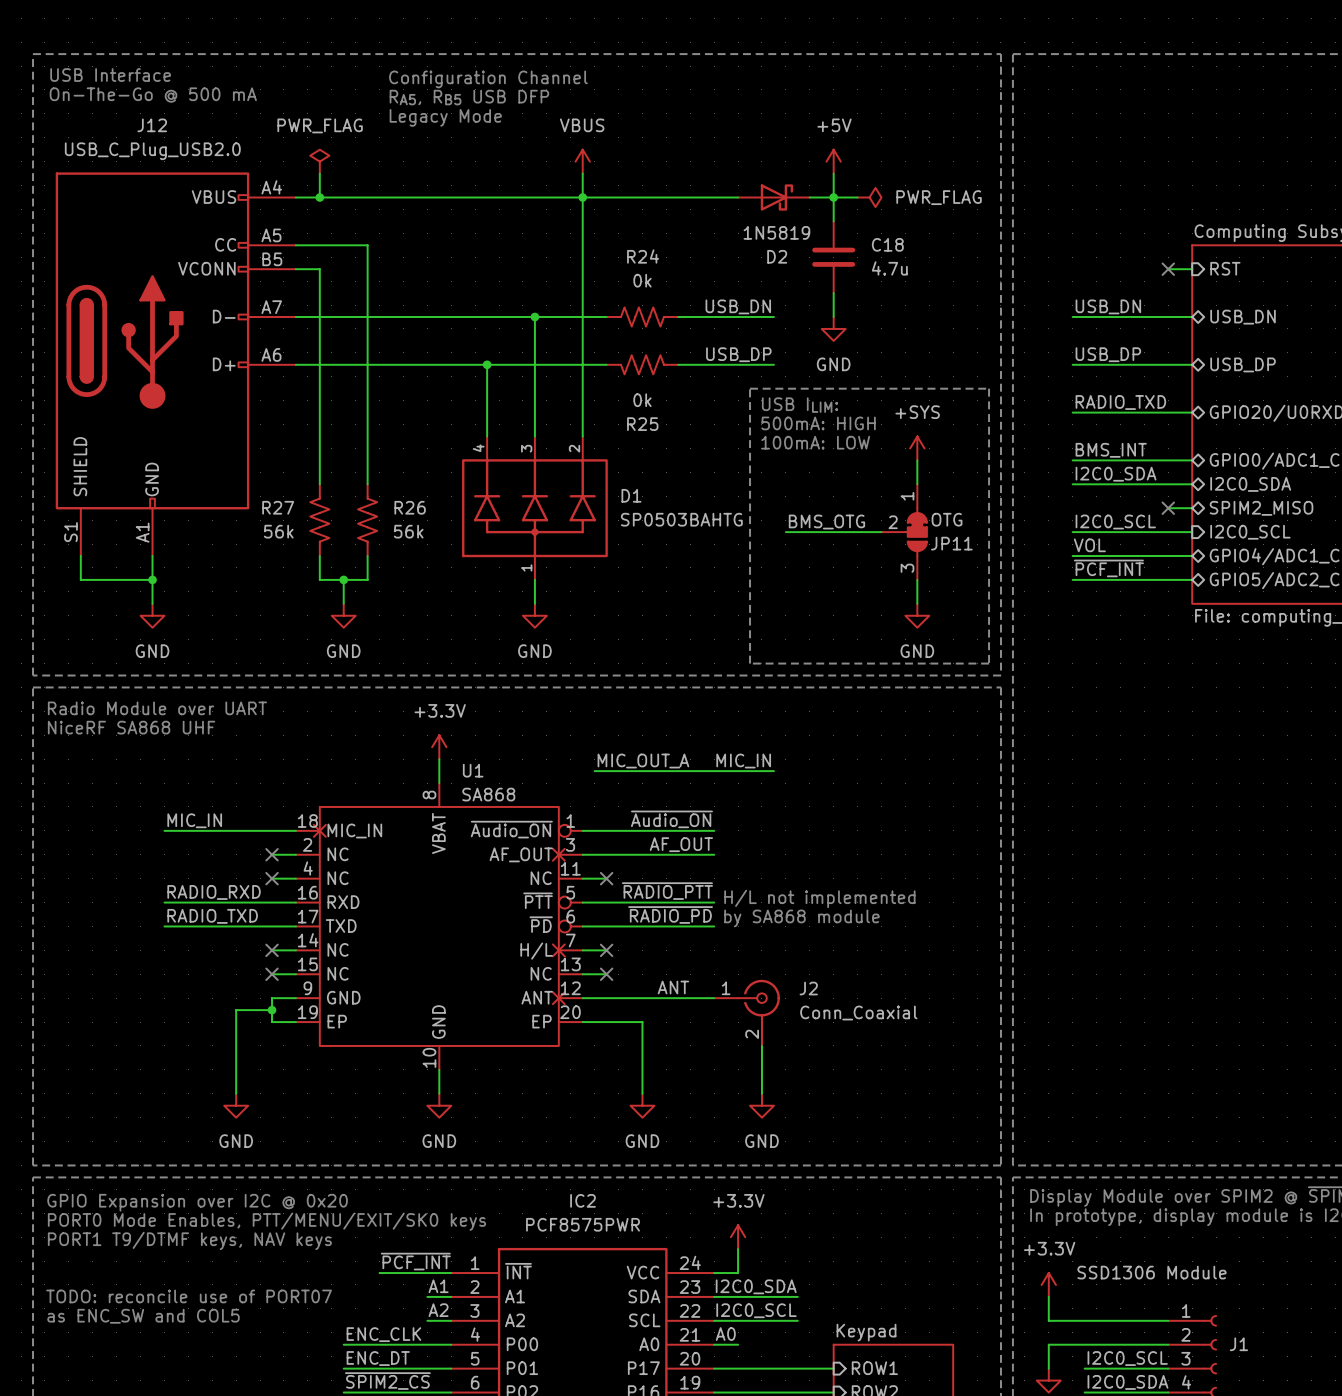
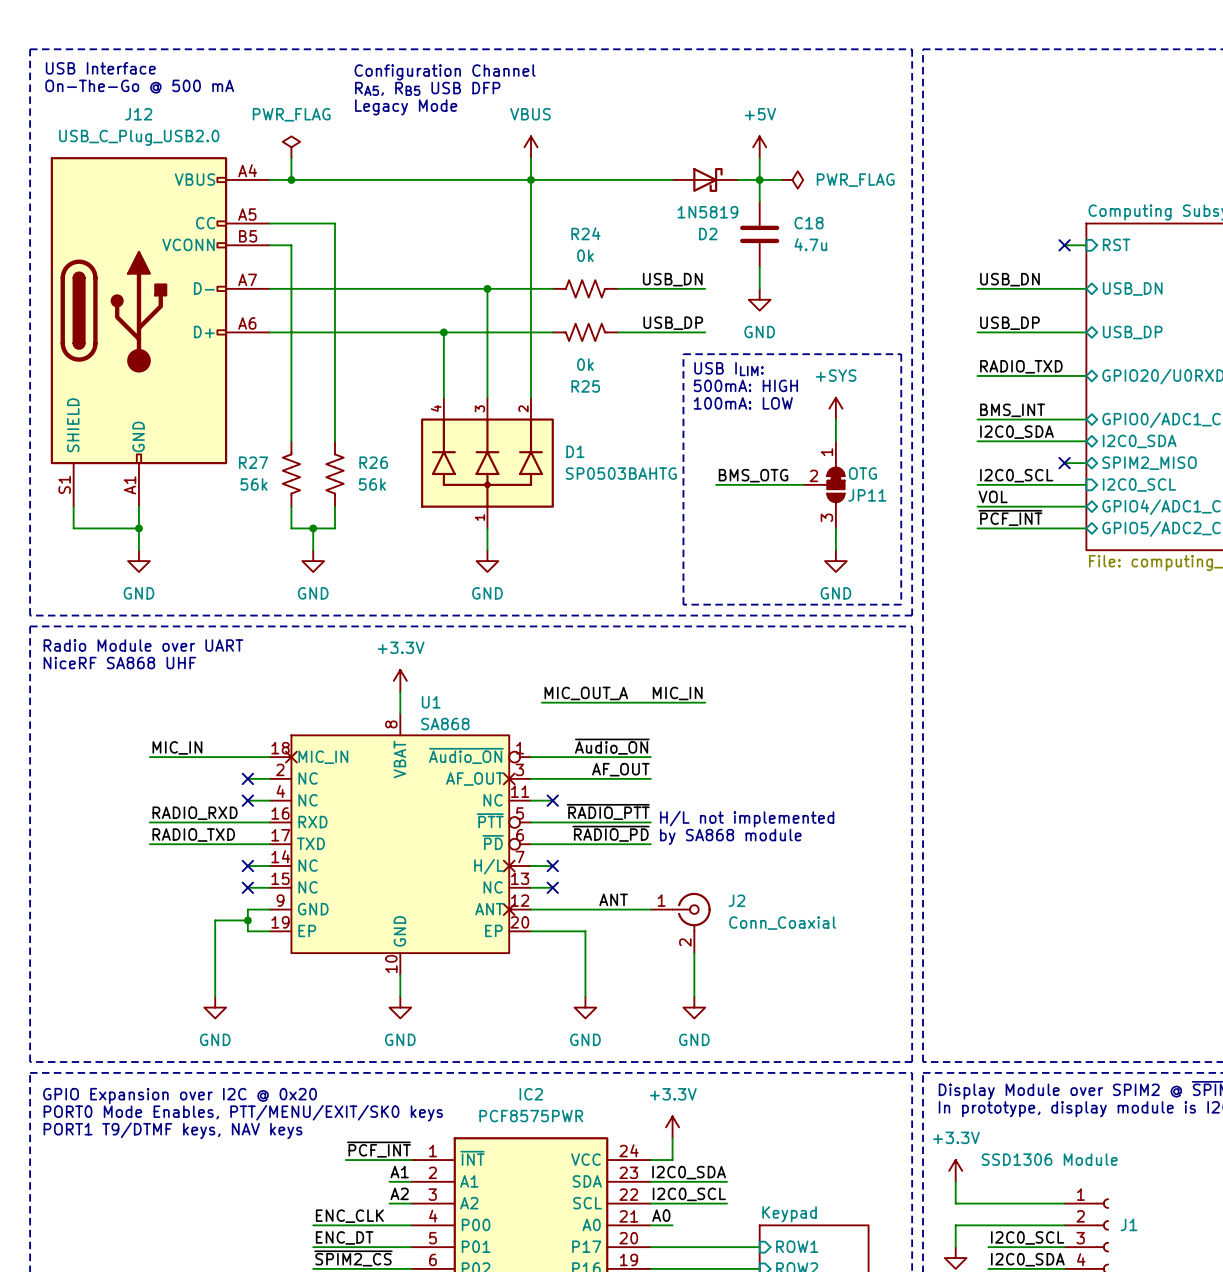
text: TODO: reconcile use of PORT07 (189, 1296) -> none
text: as ENC_SW and COL5 (143, 1316) -> none

